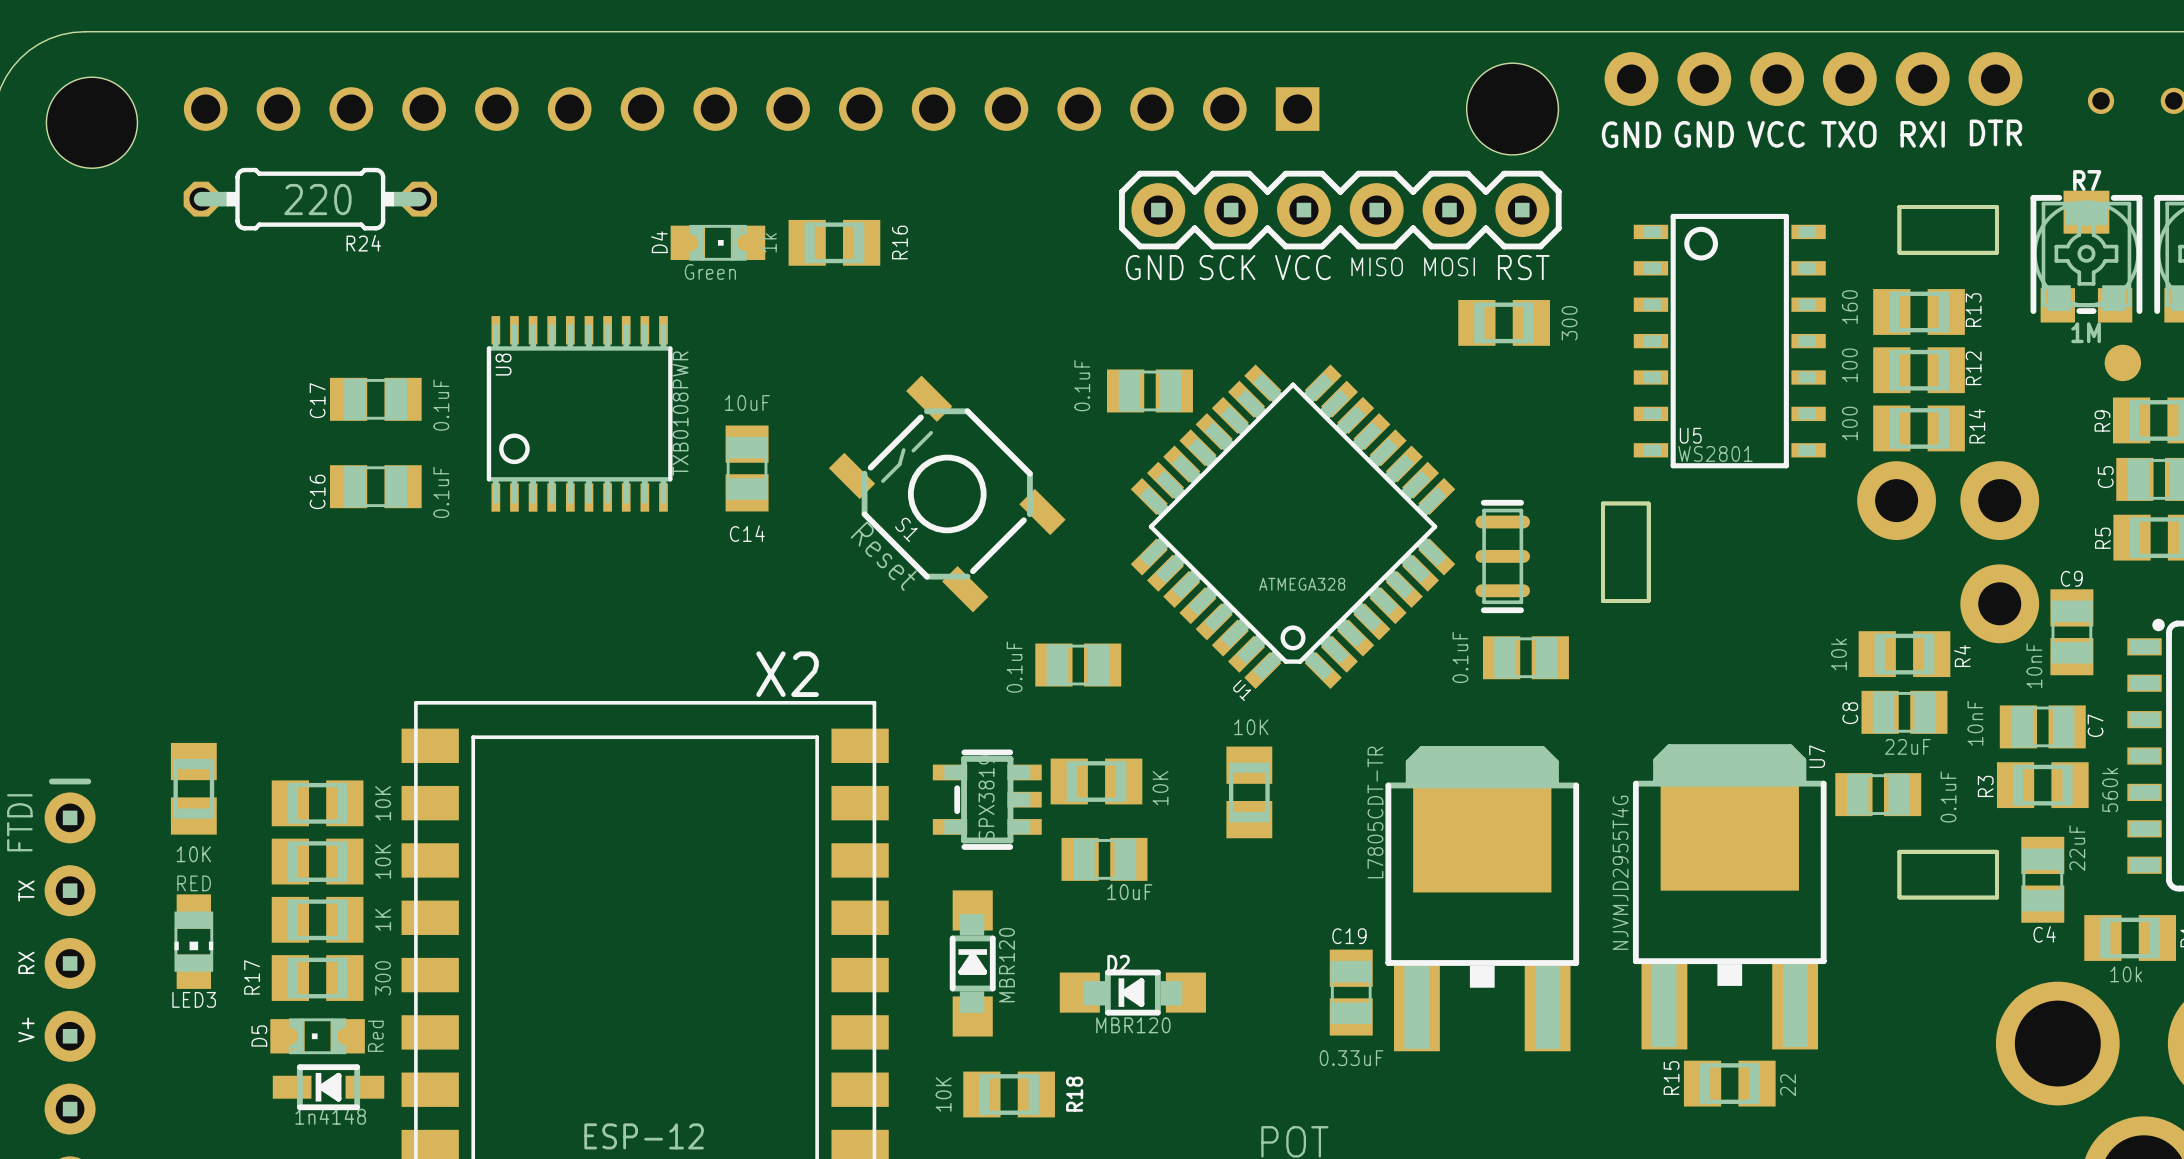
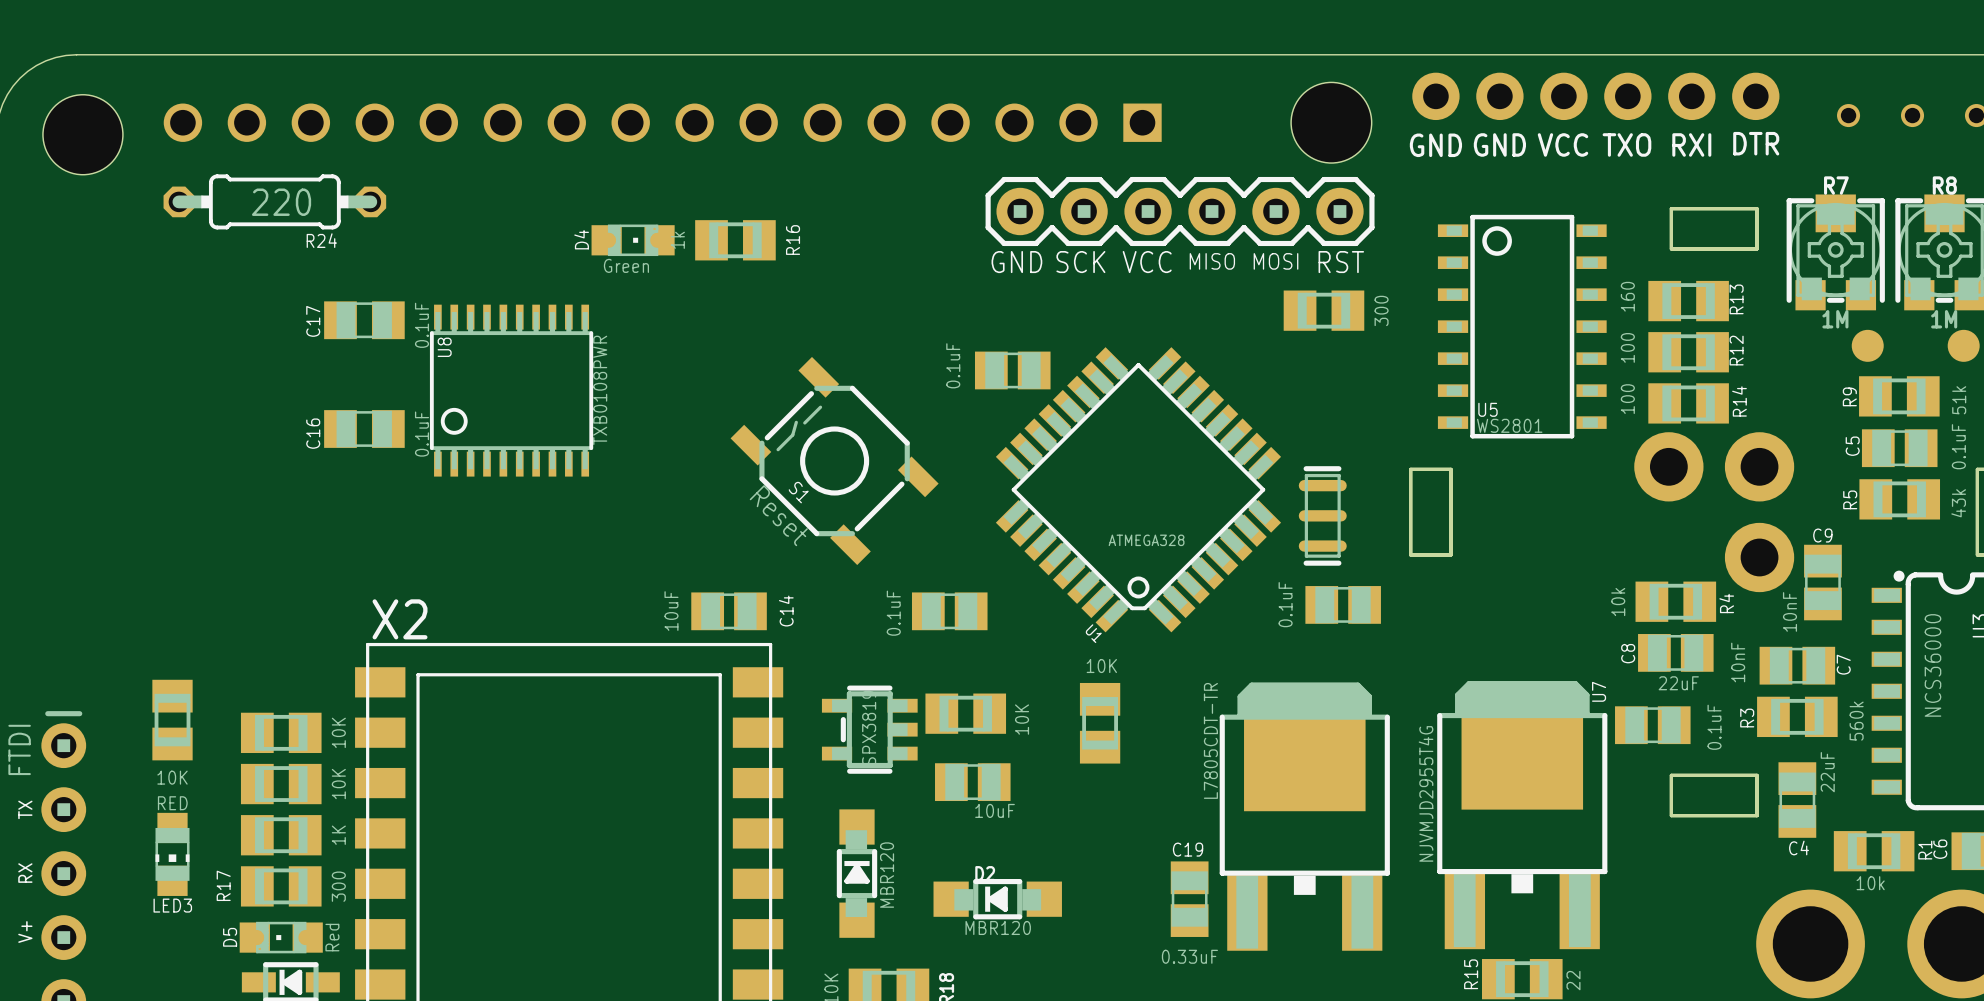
C17 position: (375, 399) -> (364, 320)
C14 value position: 10uF (747, 402) -> 10uF (671, 611)
C14 rotation: 0° (747, 468) -> 90° clockwise (729, 611)
C14 position: (747, 468) -> (729, 611)
C16 position: (375, 486) -> (364, 429)
C14 name position: C14 (747, 533) -> C14 (786, 611)
X2 name position: X2 (787, 674) -> X2 (400, 619)

